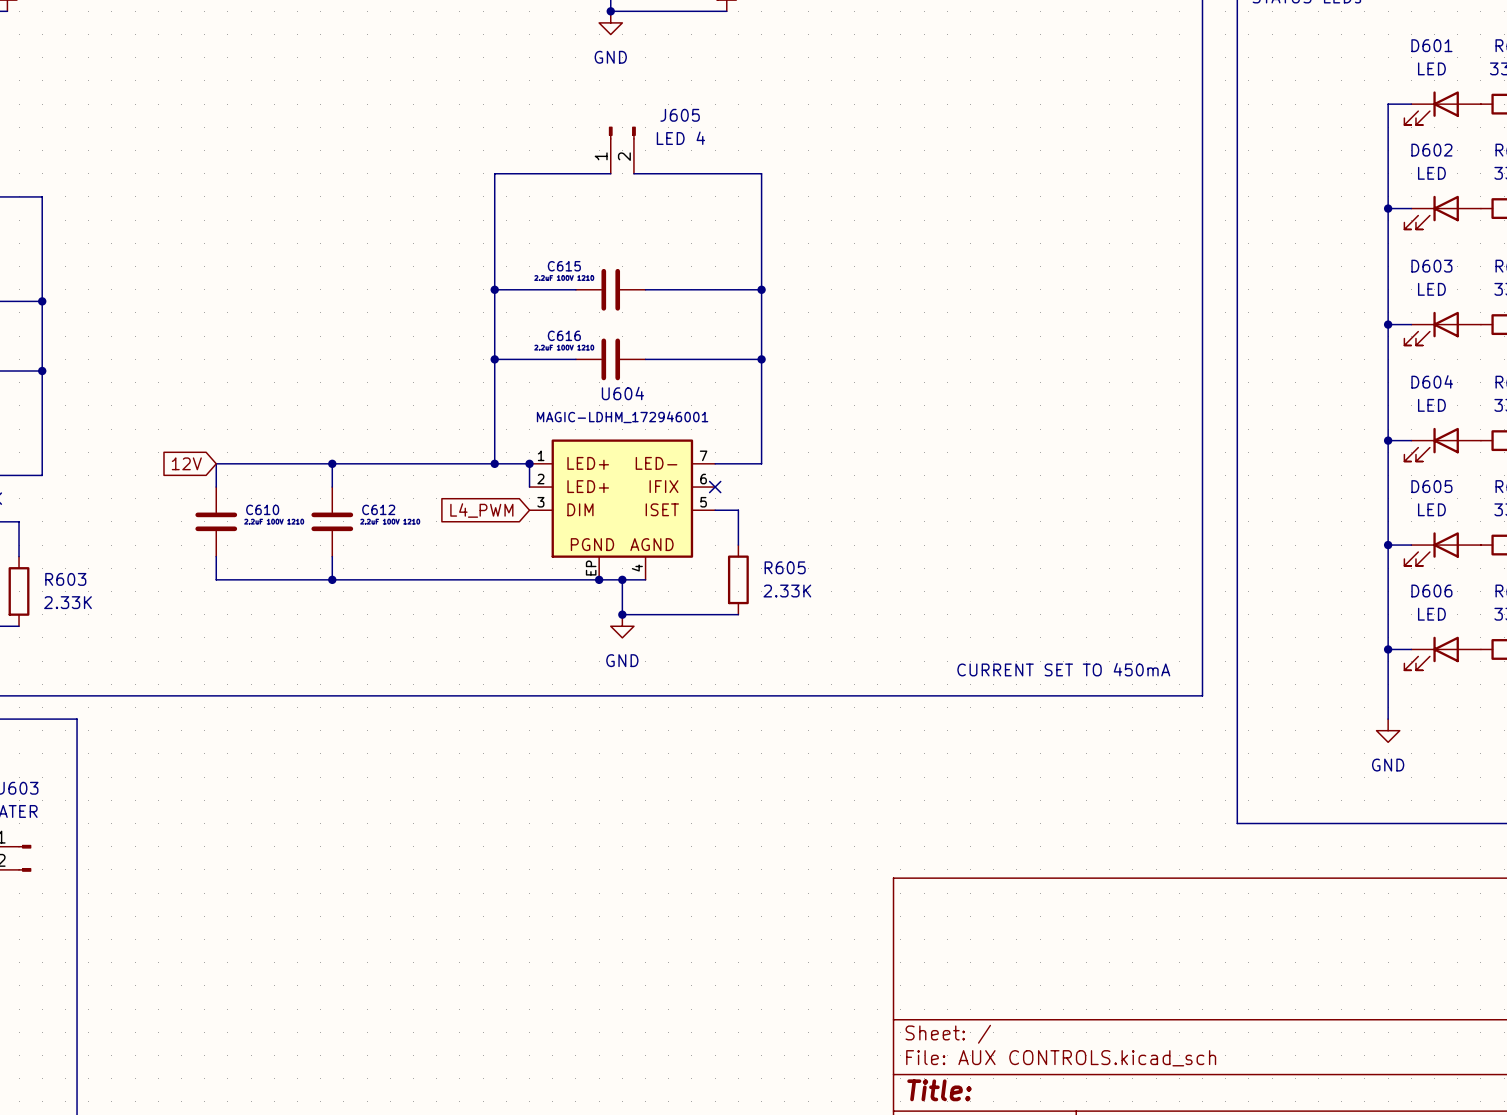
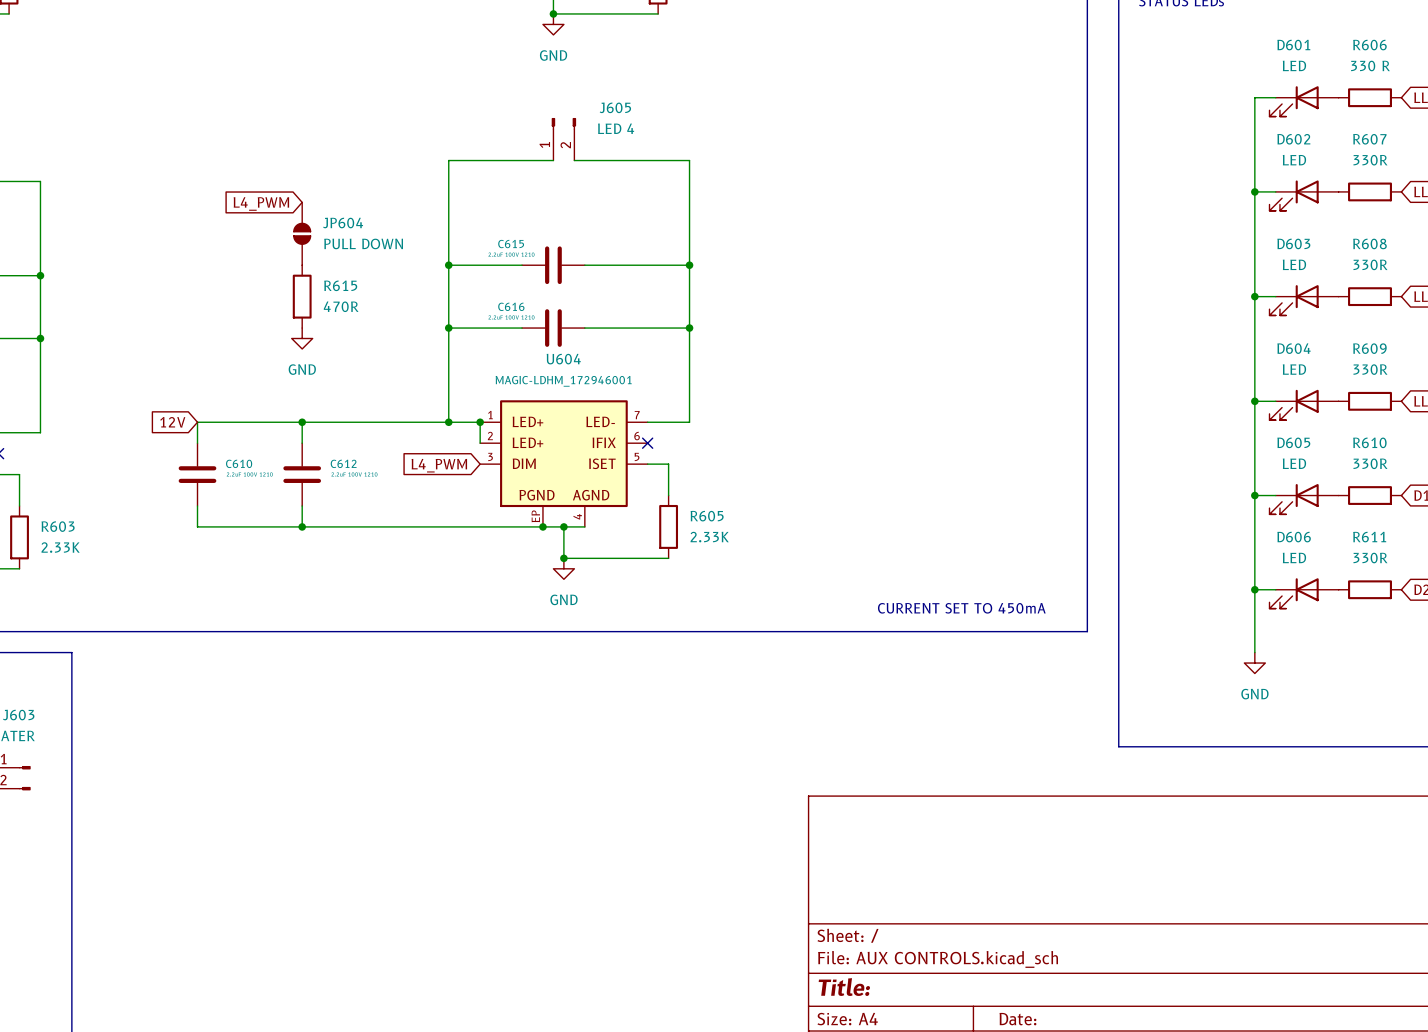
global label: none -> L4_PWM (261, 203)
JP604: none -> PULL DOWN (302, 233)
R615: none -> 470R (302, 296)
power symbol: none -> GND (302, 338)

